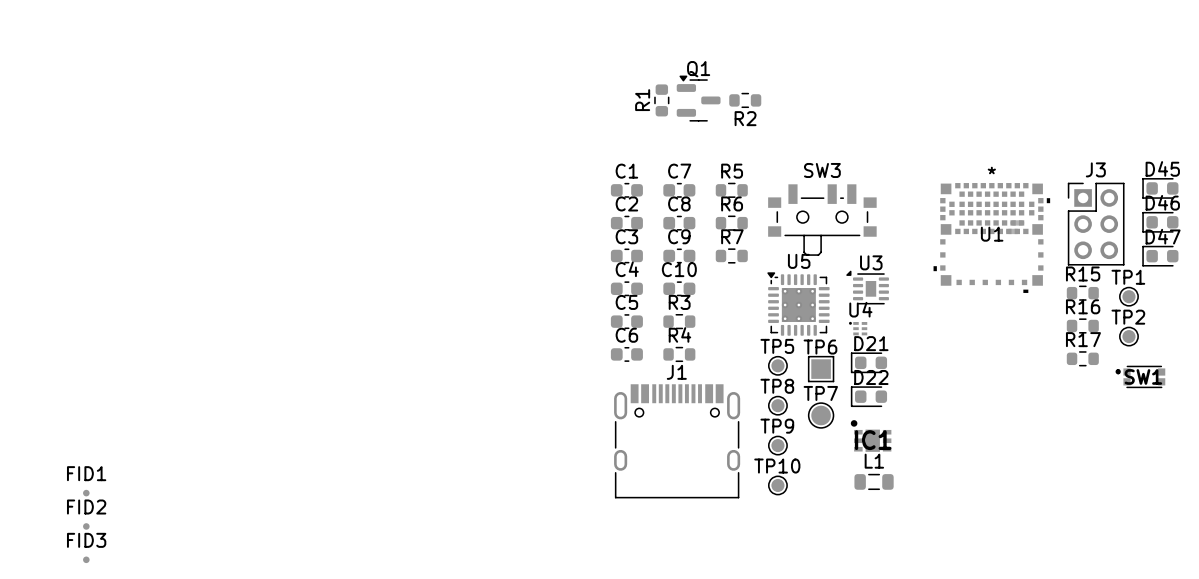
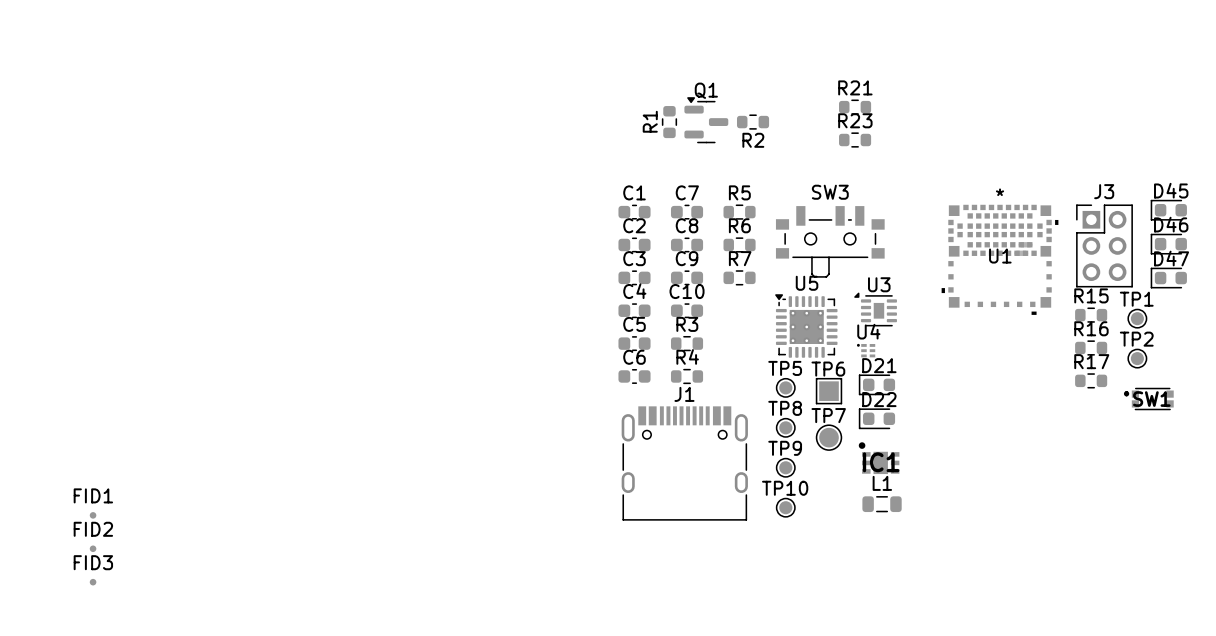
R21: none -> (855, 107)
R23: none -> (855, 140)

